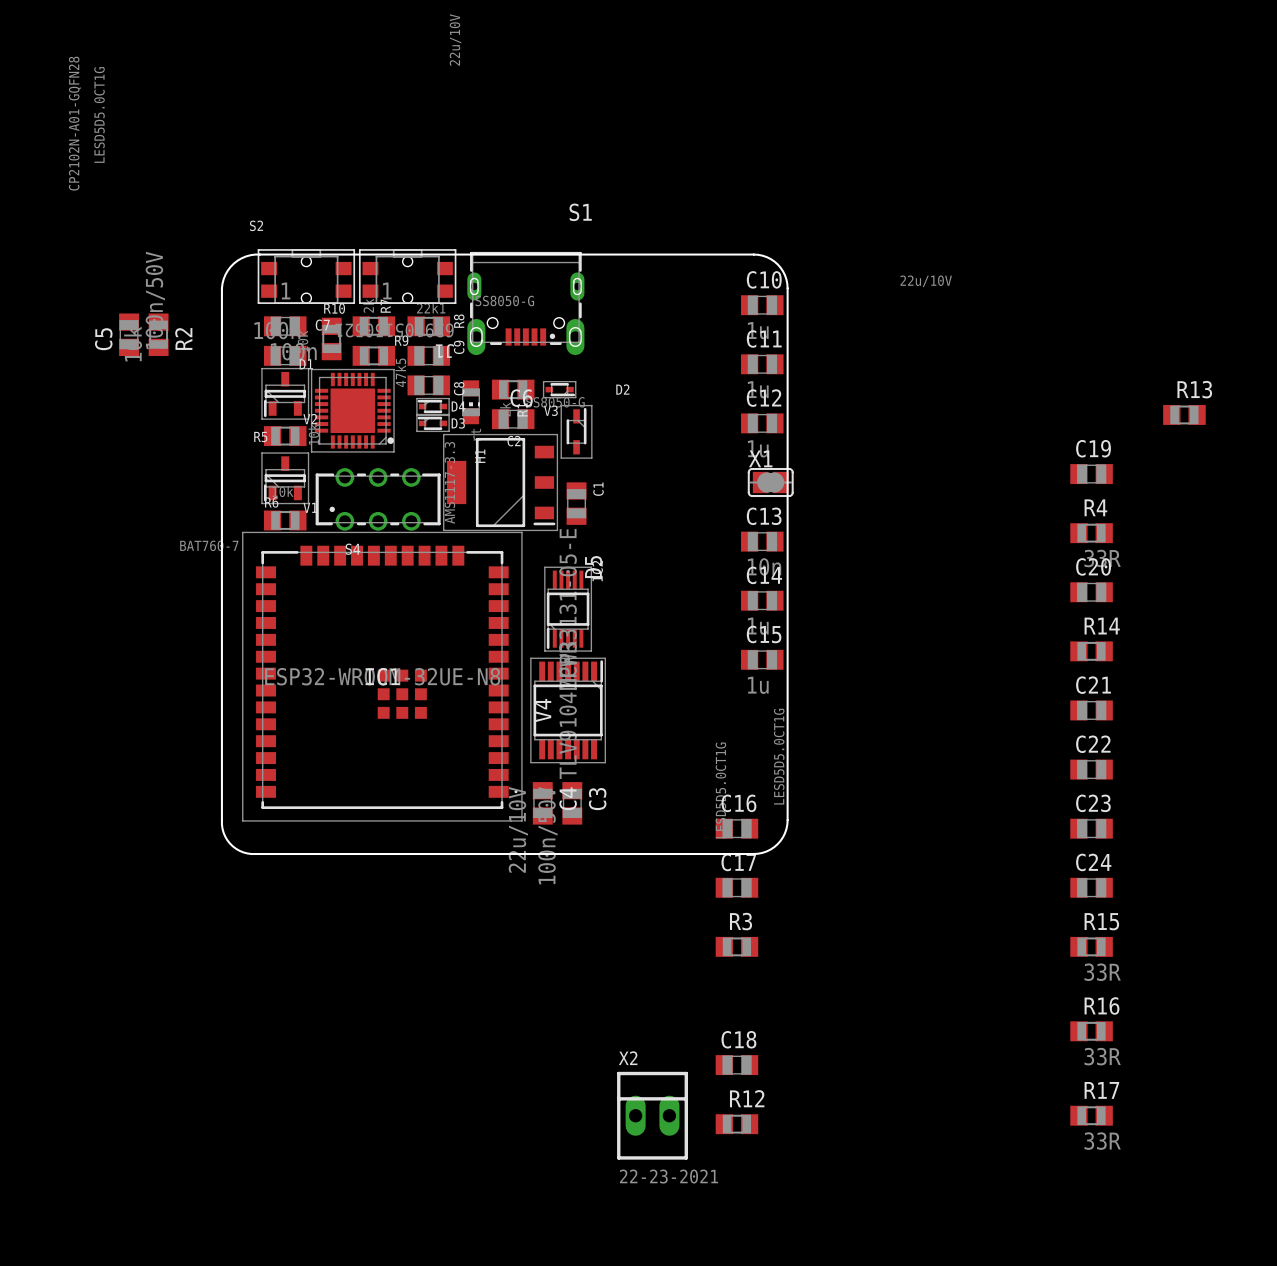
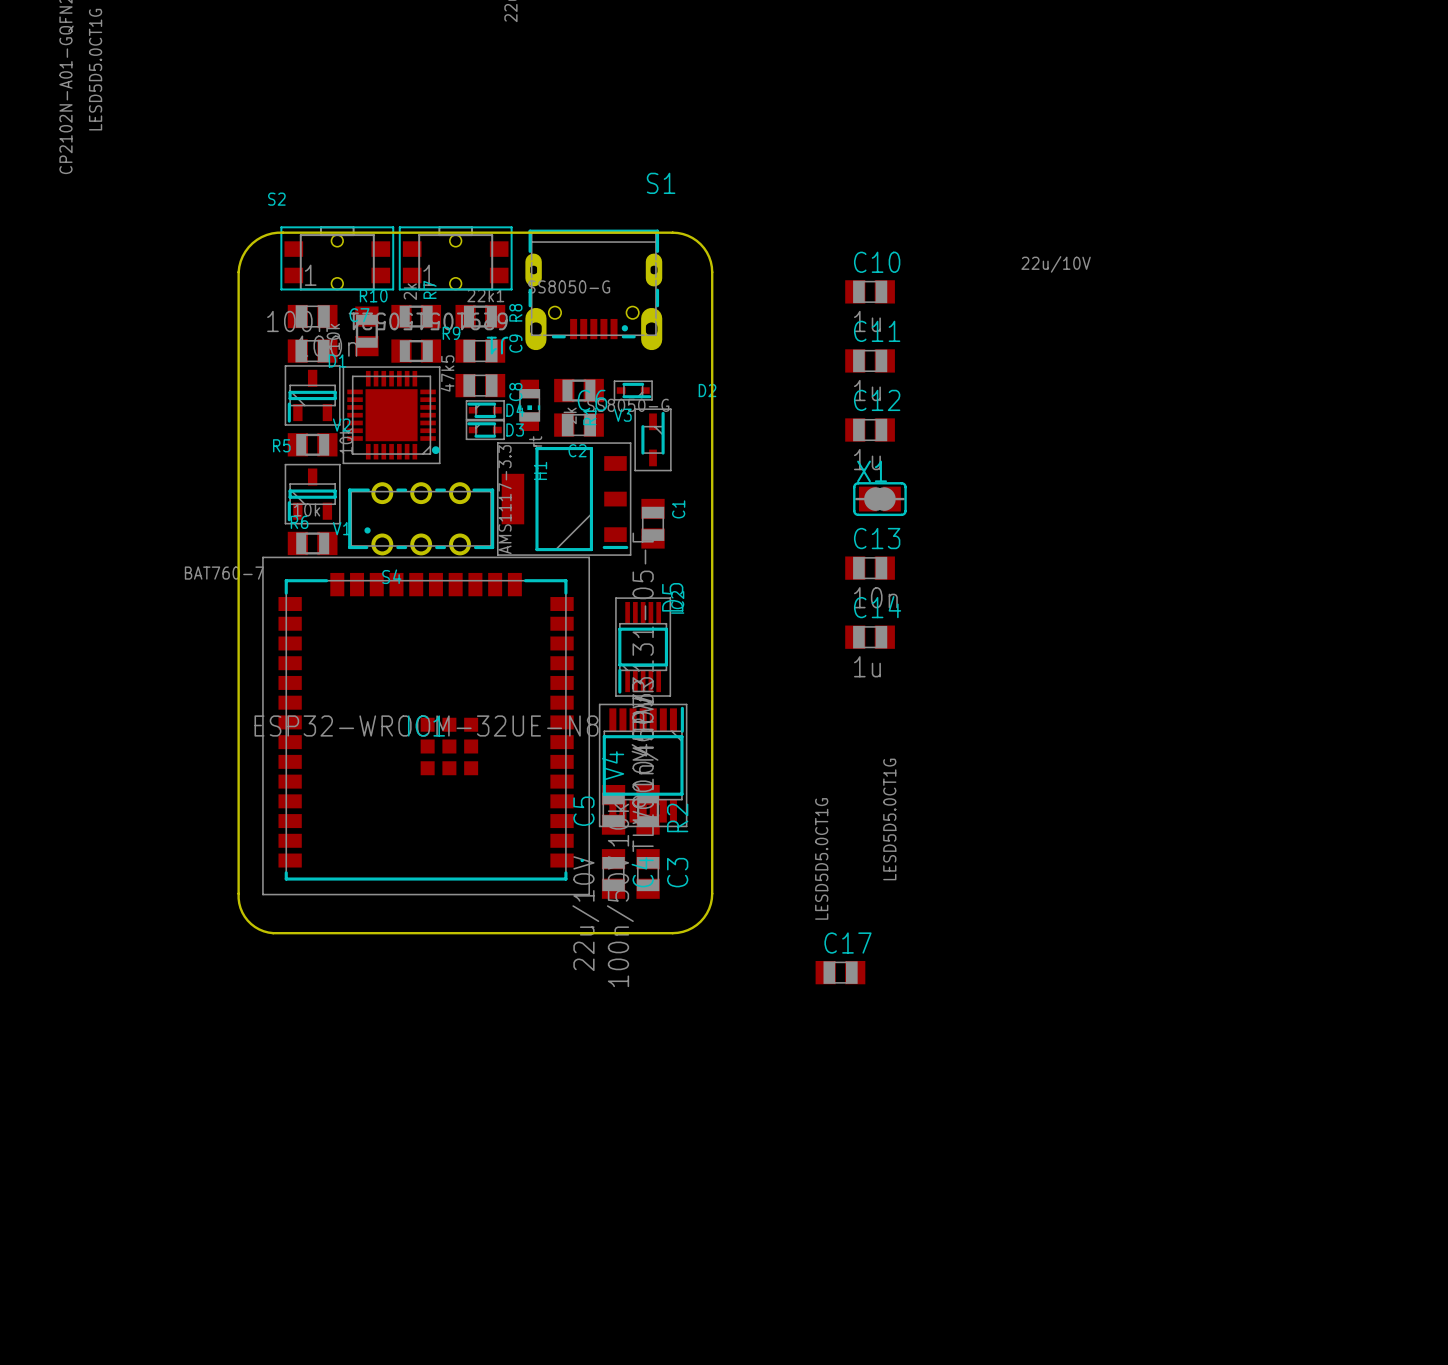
board edge: (593, 254) (758, 254) (766, 257) (777, 264) (785, 275) (787, 288) (787, 820) (785, 833) (774, 847) (758, 853) (593, 854) -> (672, 232) (687, 235) (700, 244) (709, 257) (712, 272) (712, 893) (709, 908) (700, 921) (687, 930) (672, 933)
C5 position: (129, 334) -> (613, 809)
R2 position: (158, 334) -> (648, 809)
R13: (1184, 414) -> none
C19: (1091, 474) -> none
R4: 33R (1091, 533) -> none
C20: (1091, 592) -> none
R14: (1091, 651) -> none
C15: 1u (762, 659) -> none
C21: (1091, 710) -> none
C22: (1091, 769) -> none
C16: (736, 828) -> none
C23: (1091, 828) -> none
C24: (1091, 887) -> none
R3: (736, 946) -> none
R15: 33R (1091, 946) -> none
R16: 33R (1091, 1031) -> none
C18: (736, 1065) -> none
X2: 22-23-2021 (652, 1115) -> none
R17: 33R (1091, 1115) -> none
R12: (736, 1124) -> none

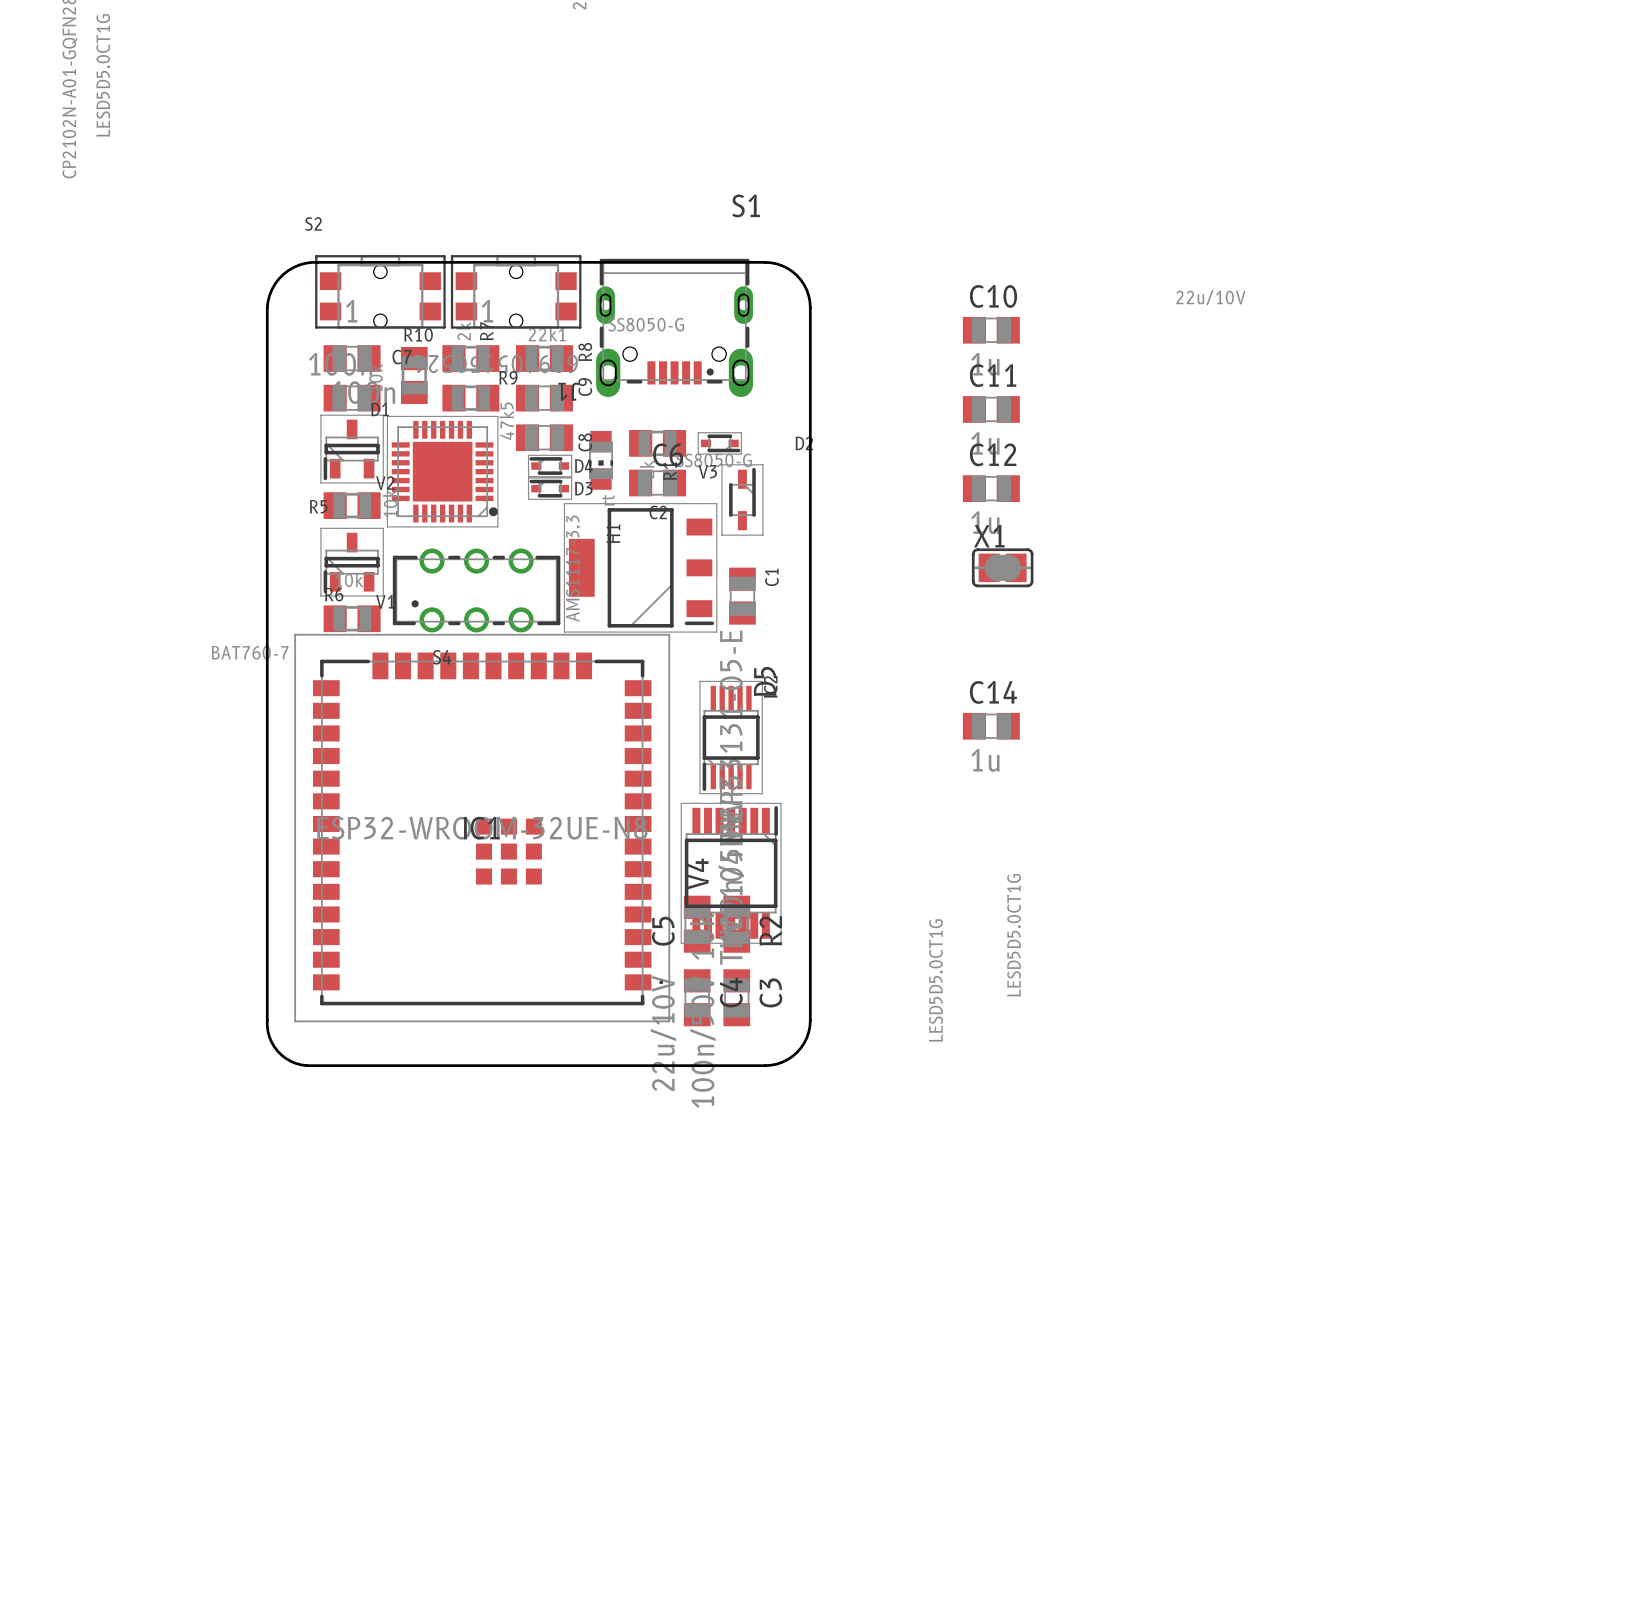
C13: 10n (870, 568) -> none
C17: (840, 972) -> none

